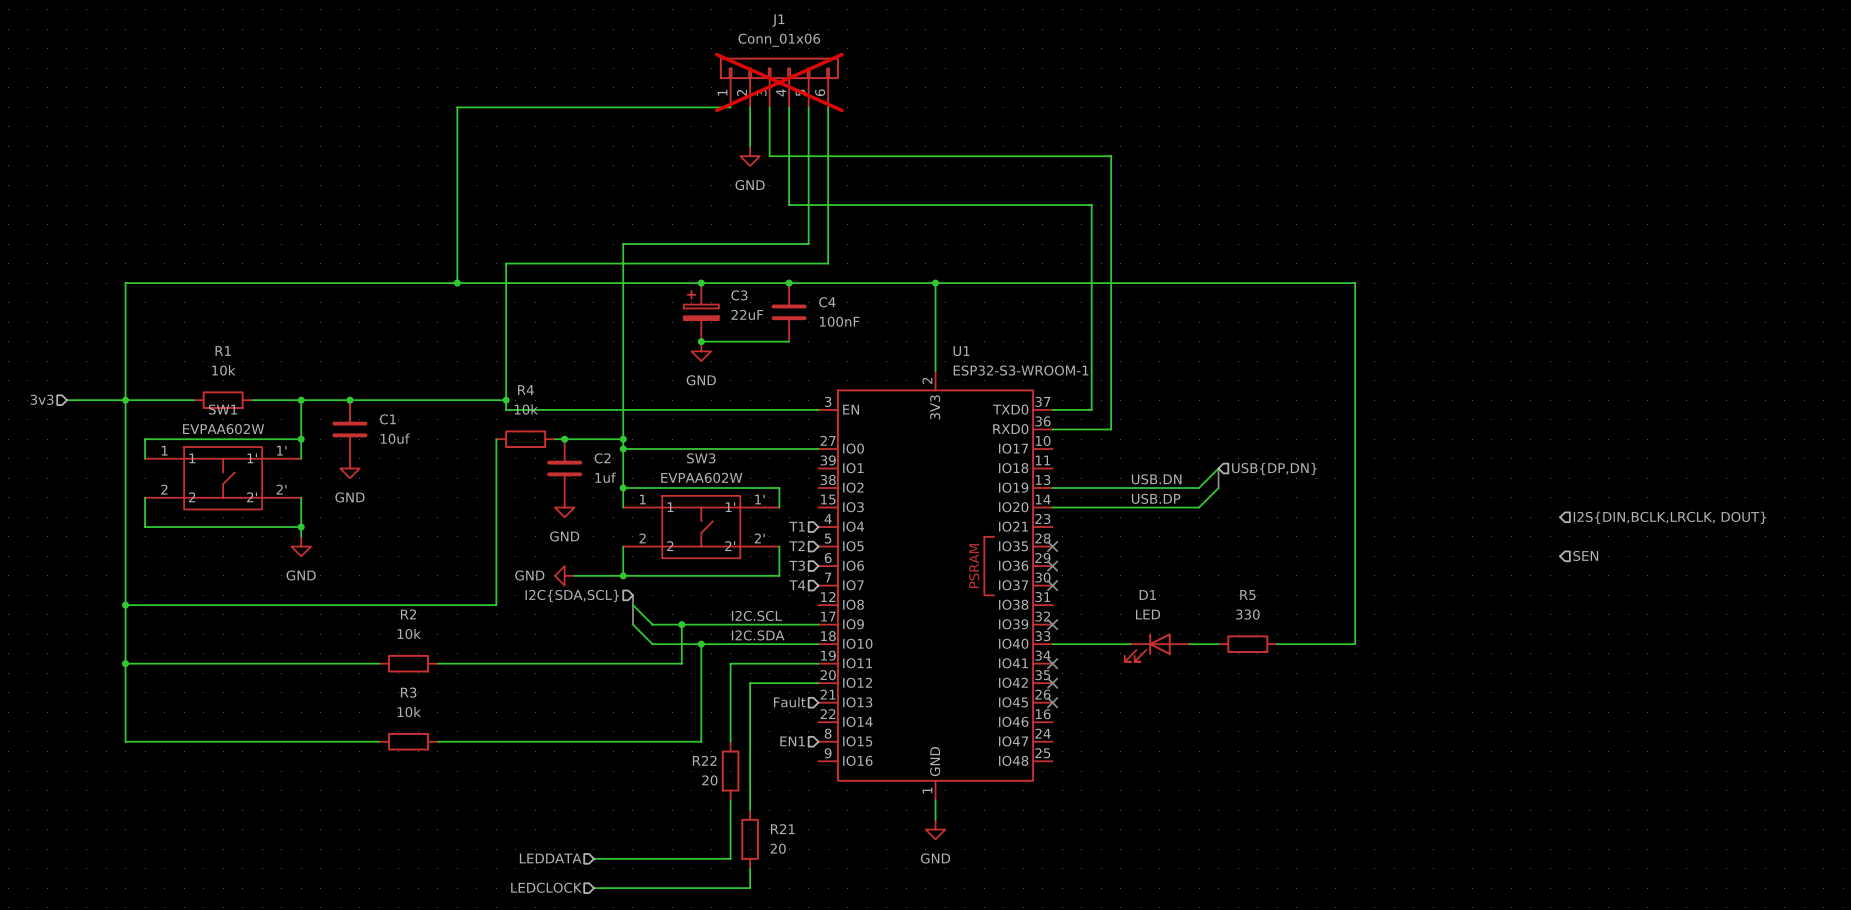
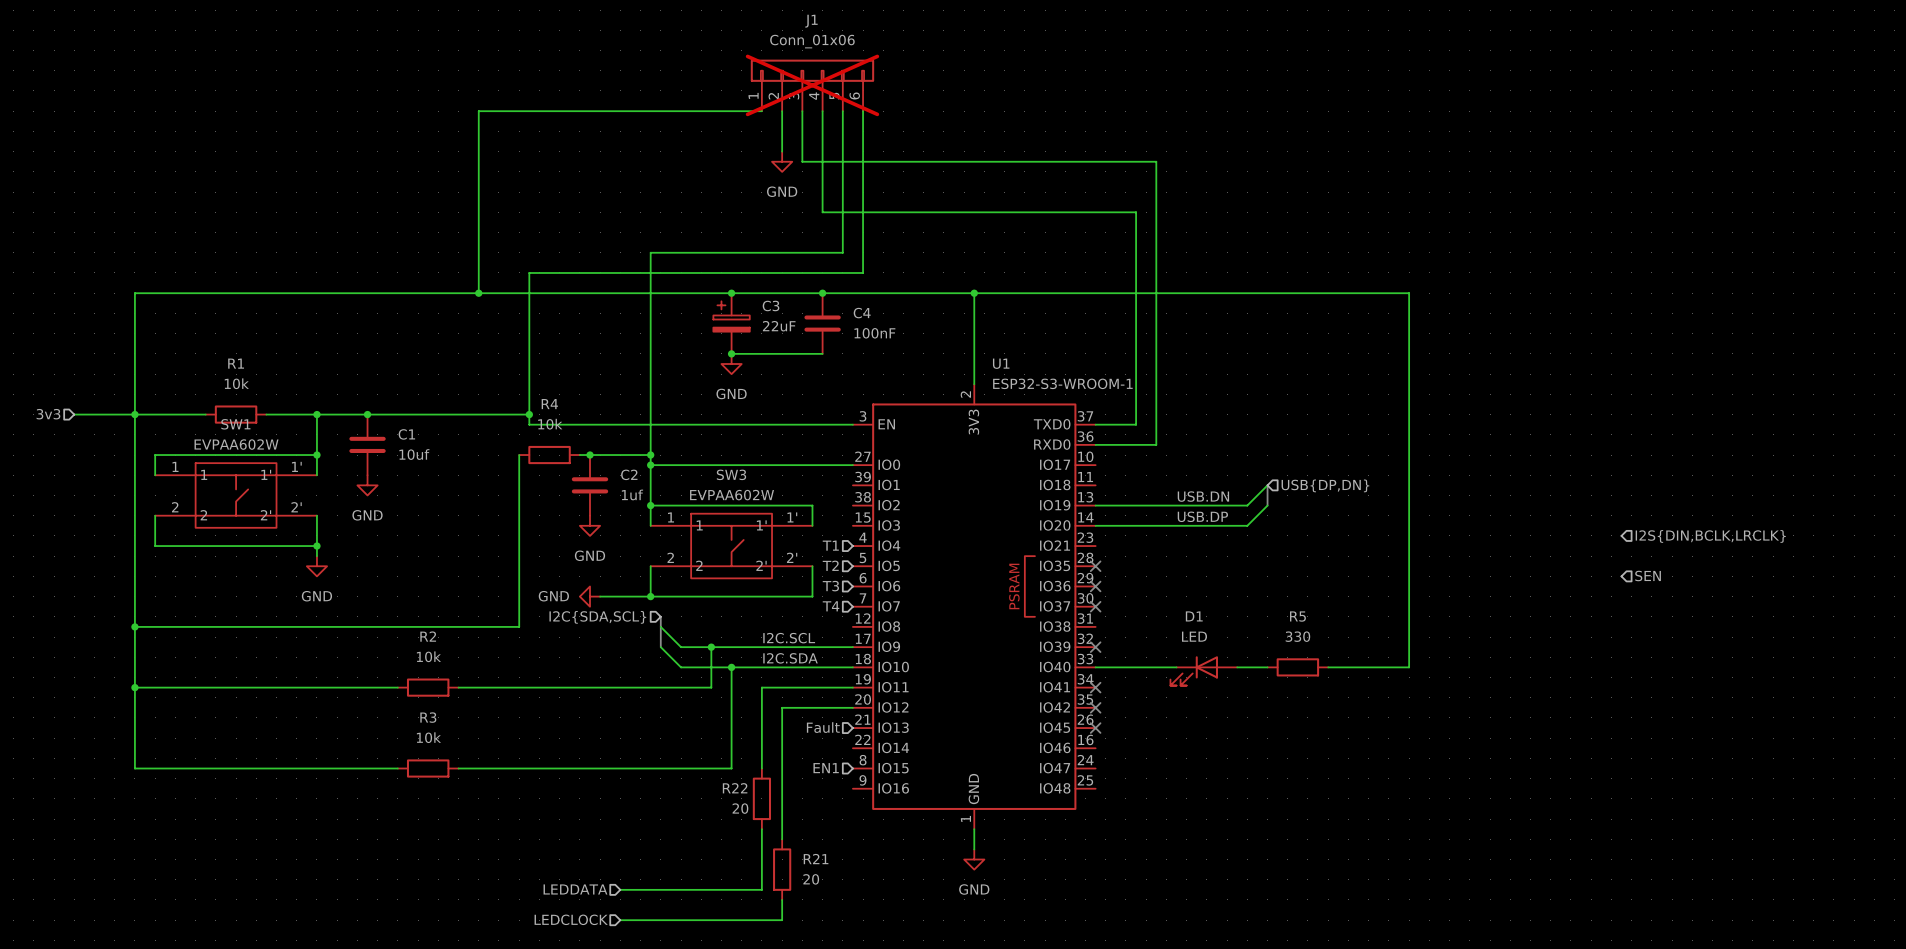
hierarchical label: I2S{DIN,BCLK,LRCLK, DOUT} (1669, 517) -> I2S{DIN,BCLK,LRCLK} (1710, 536)

